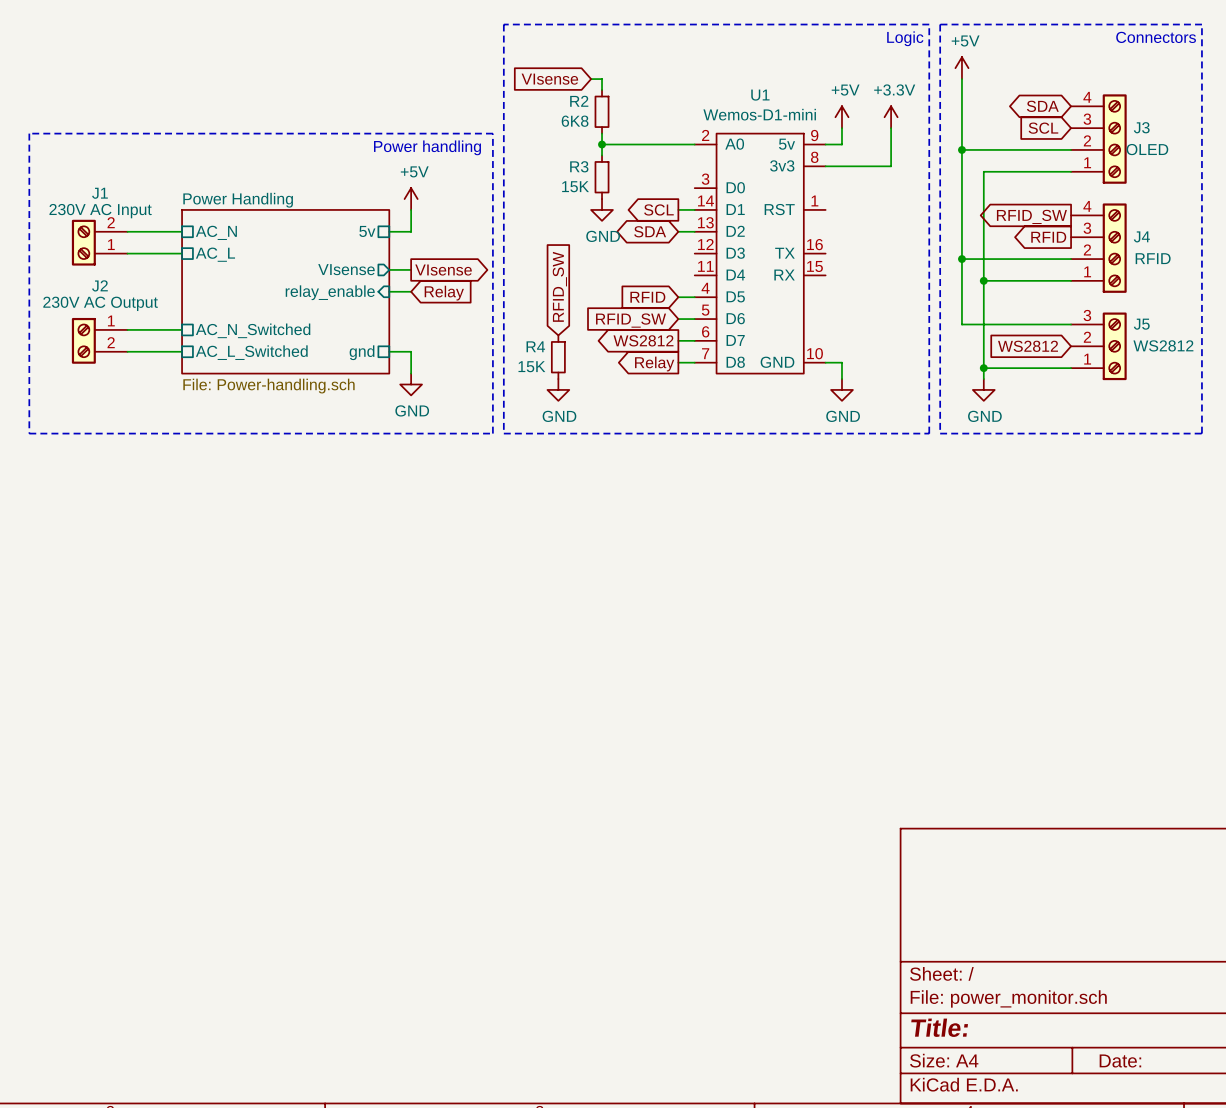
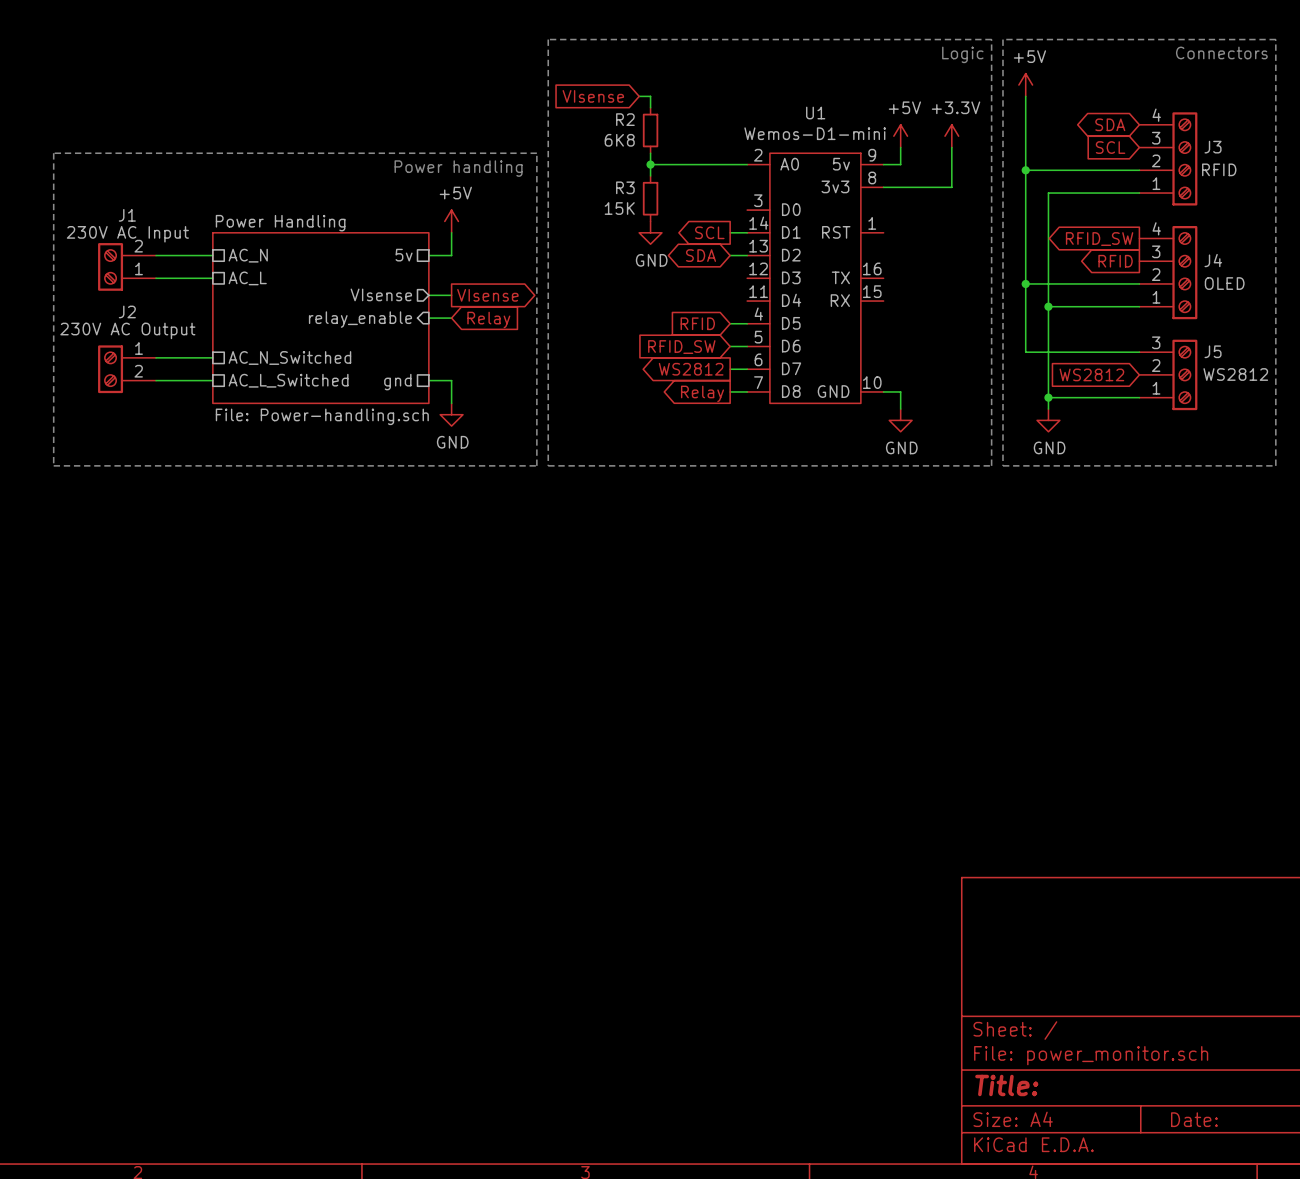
J3 value: OLED (1147, 149) -> RFID (1219, 169)
J4 value: RFID (1153, 258) -> OLED (1224, 283)
global label: RFID_SW (559, 286) -> none
R4: 15K (558, 357) -> none
power symbol: GND (558, 389) -> none

